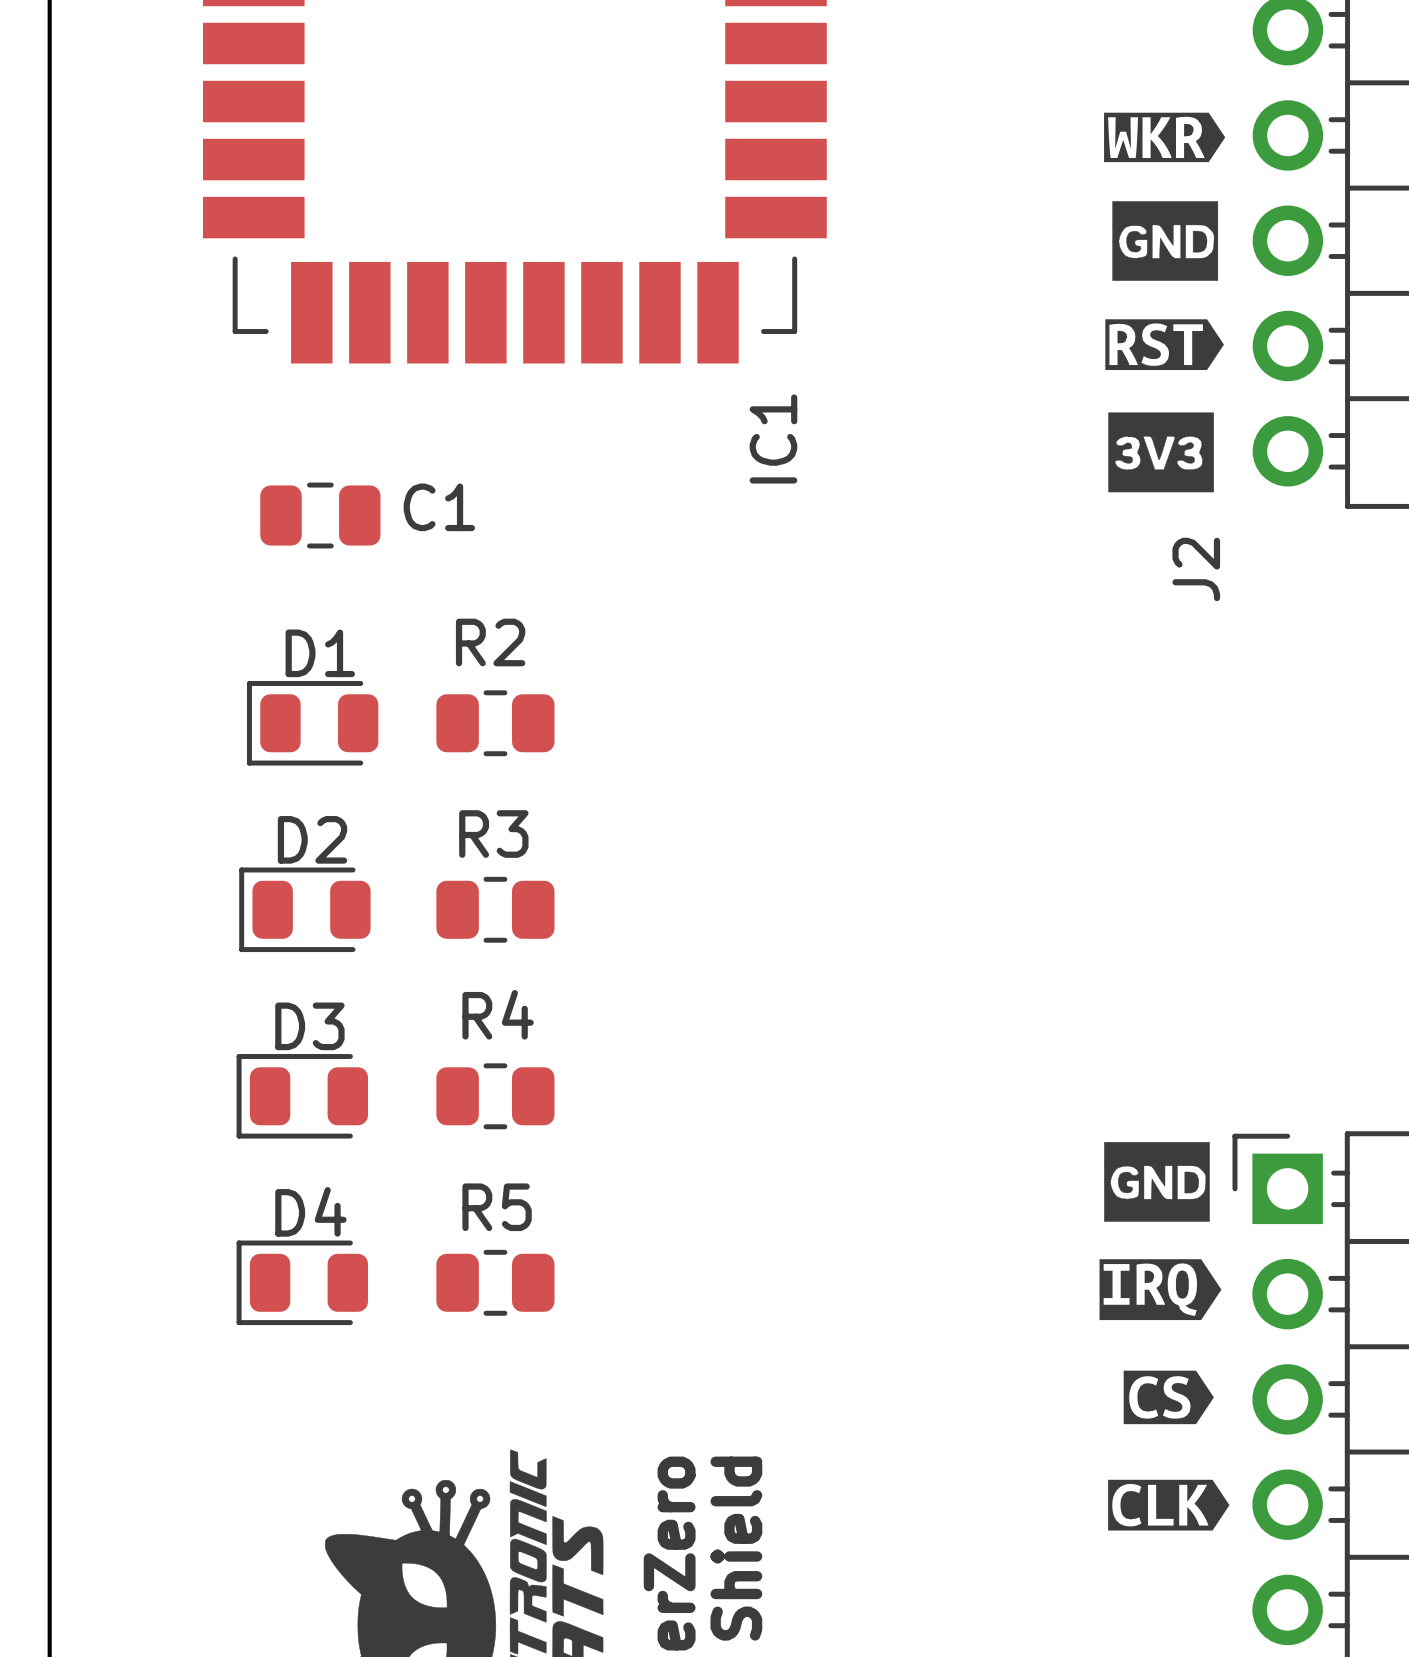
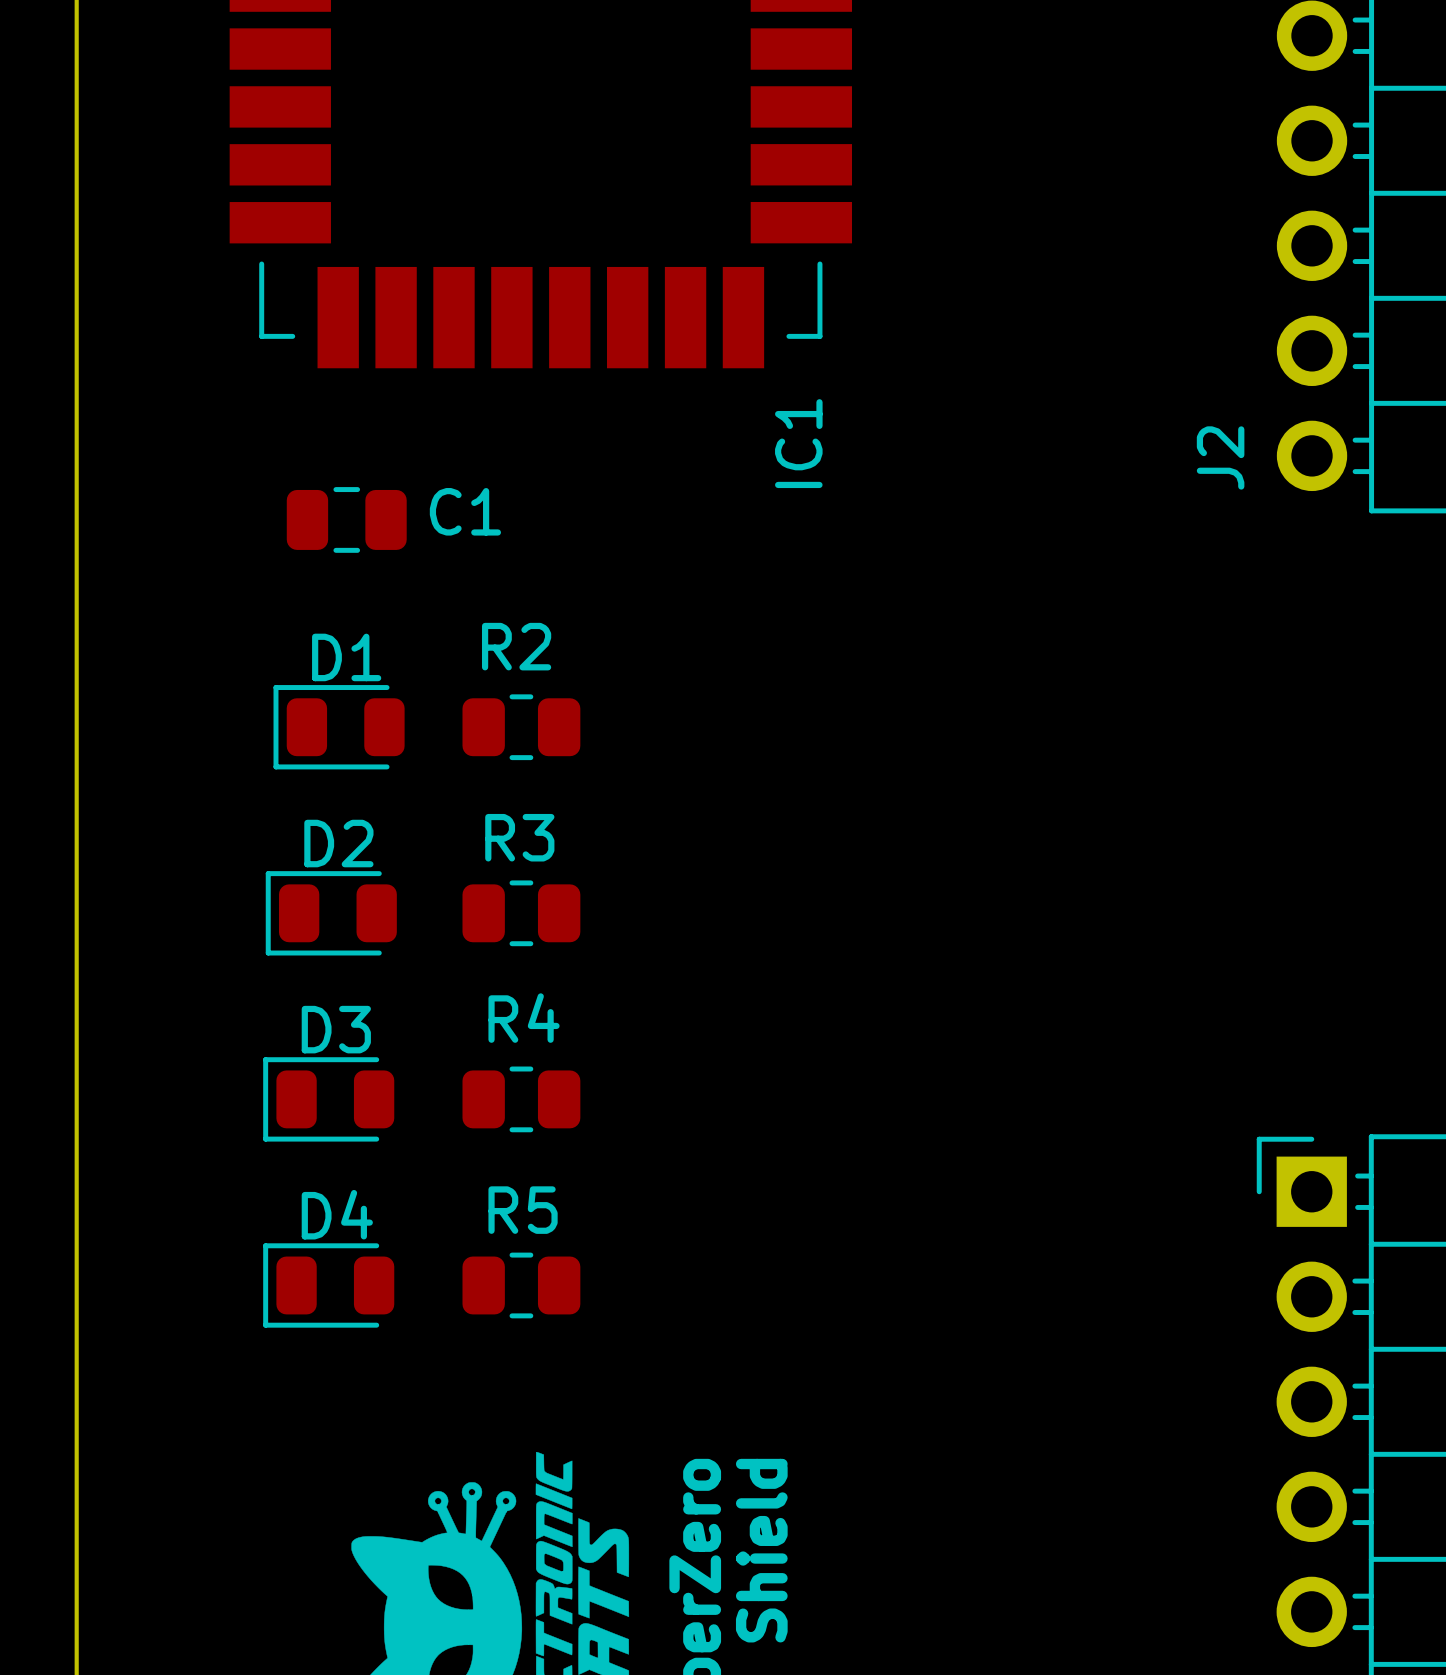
drawing: [1104, 112, 1226, 493] -> none
J2 name position: J2 (1196, 569) -> J2 (1220, 457)
drawing: [1099, 1142, 1222, 1321] -> none
drawing: [1123, 1370, 1214, 1425] -> none
drawing: [1108, 1479, 1230, 1531] -> none

